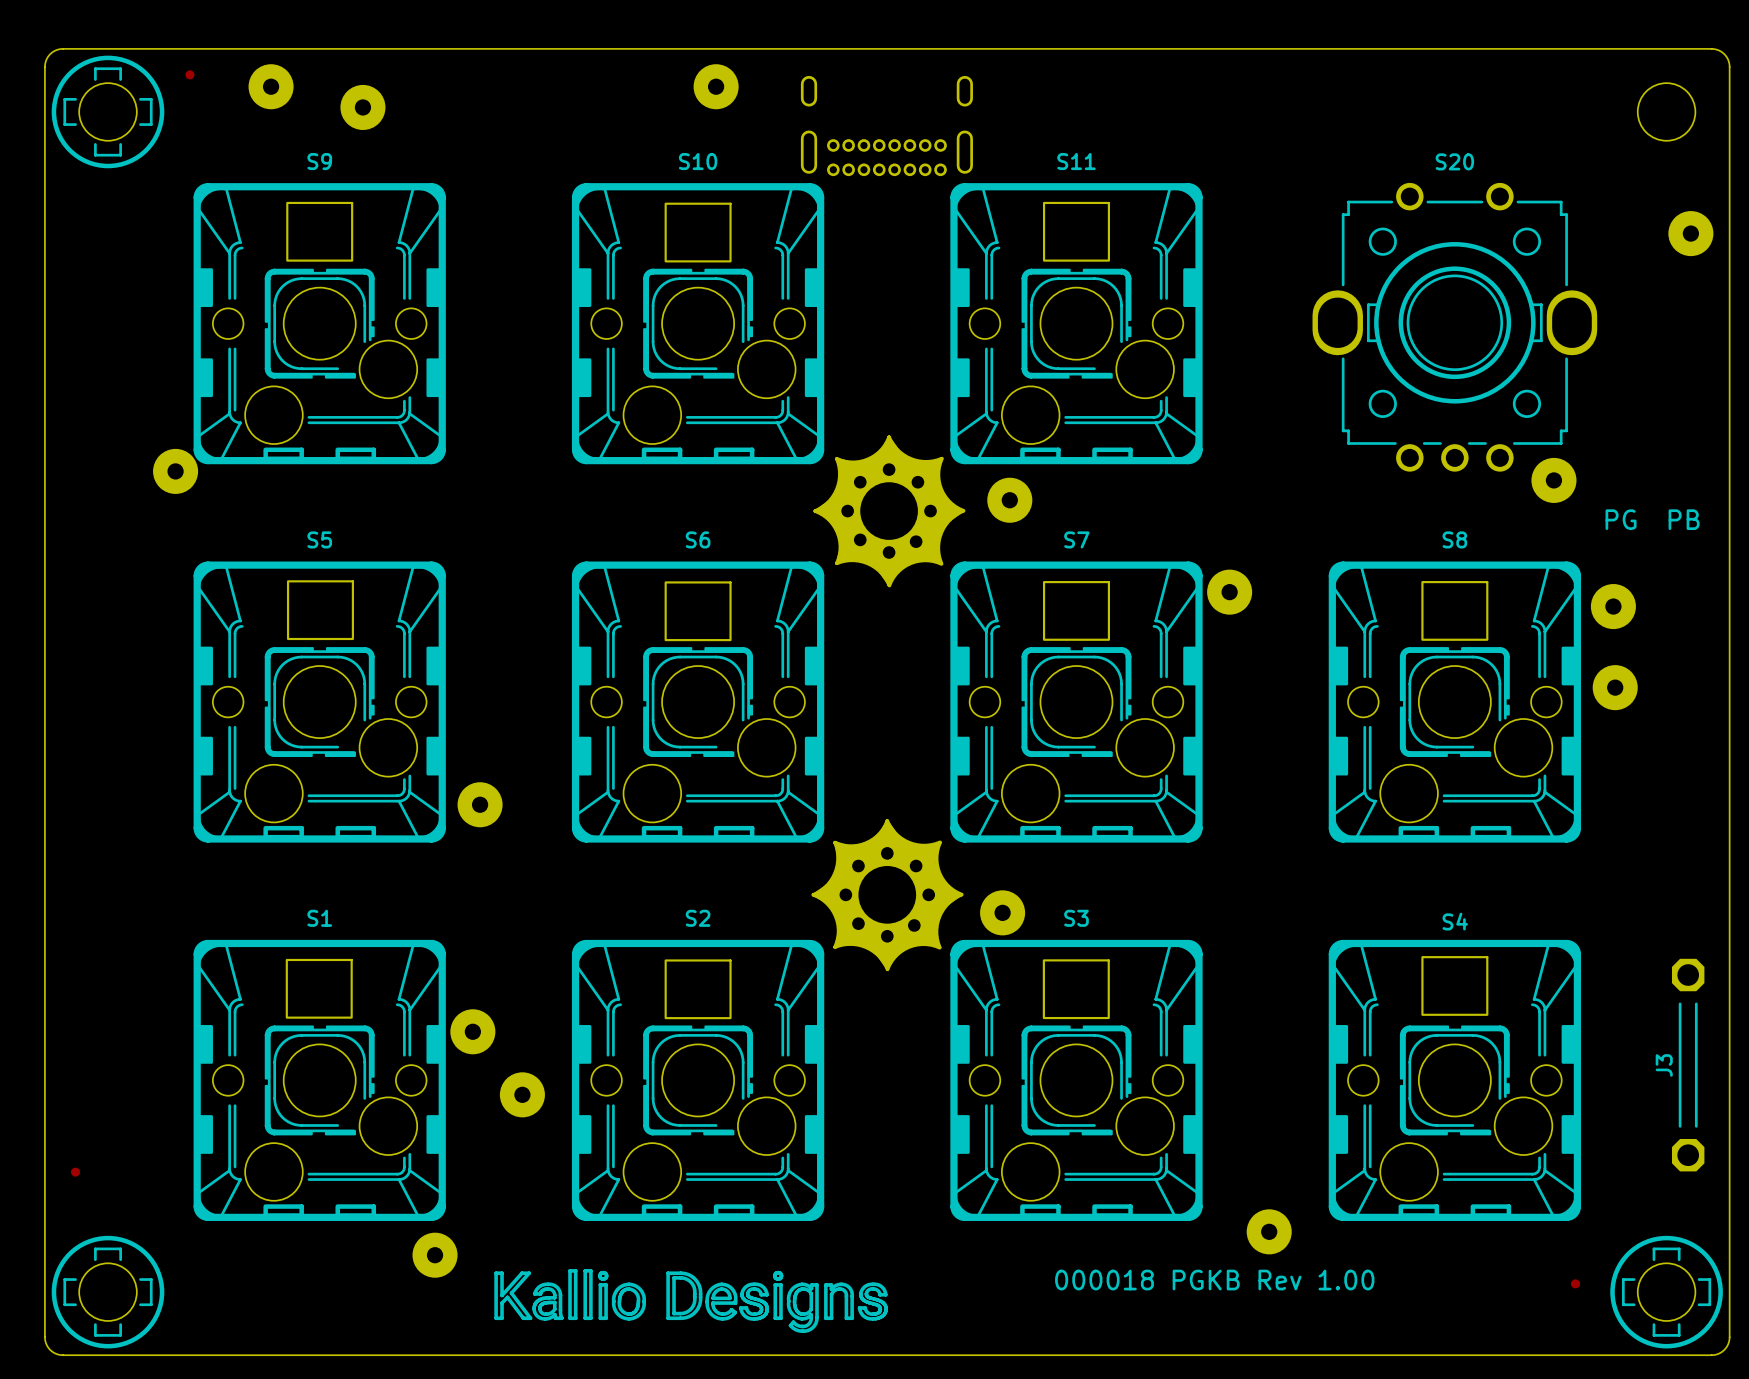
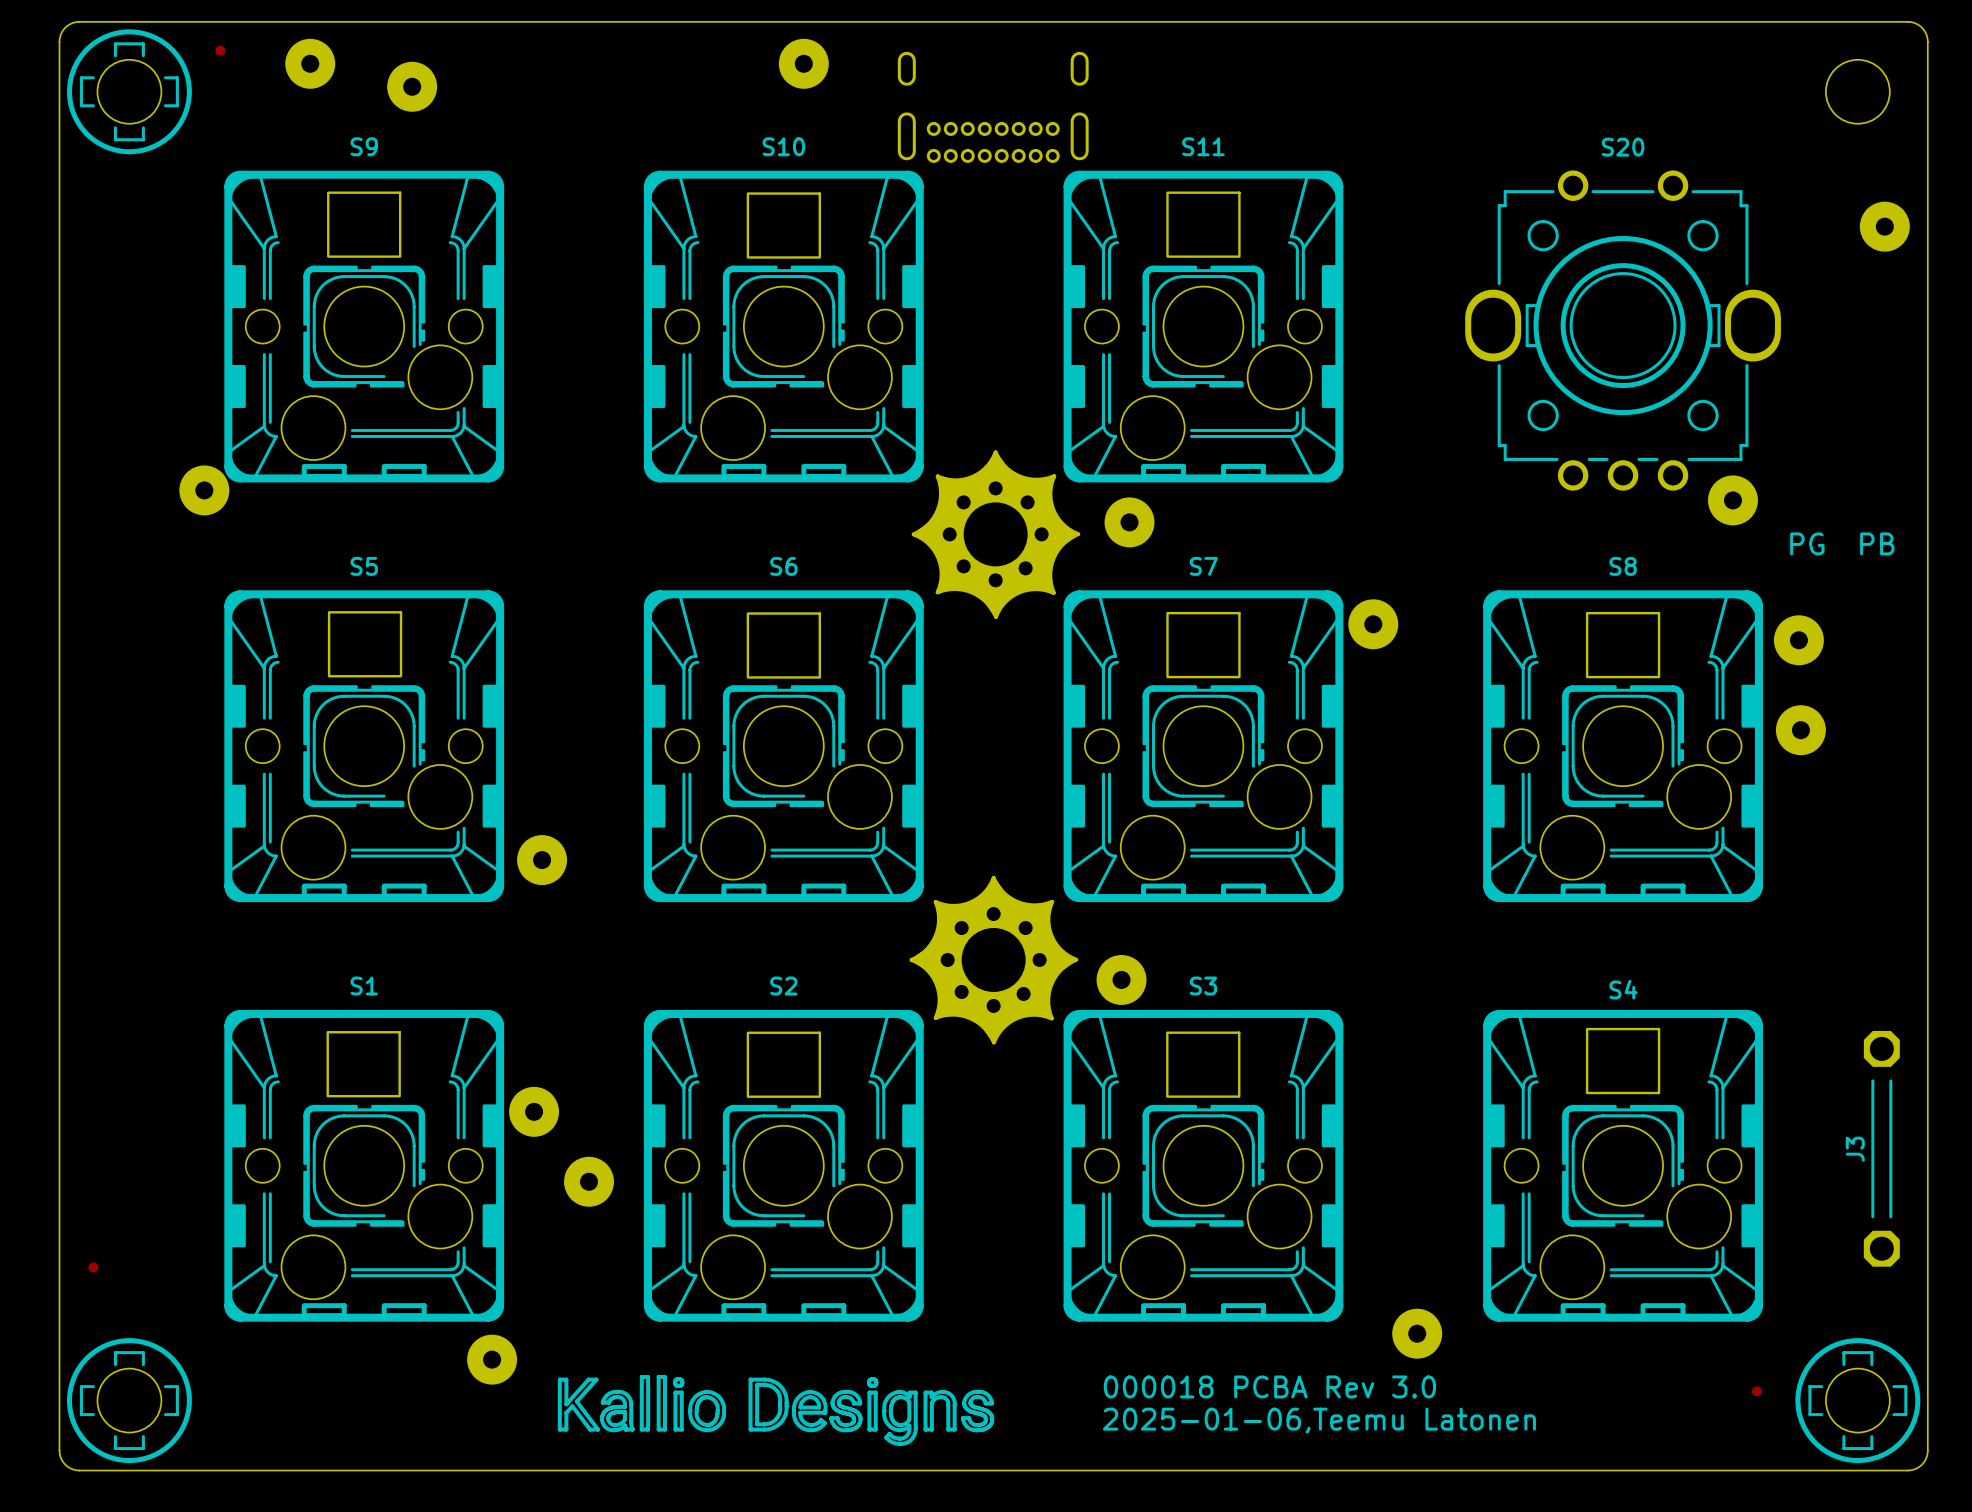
text: 000018 PGKB Rev 1.00 (1214, 1280) -> 000018 PCBA Rev 3.0 (1269, 1386)
text: none -> 2025-01-06,Teemu Latonen (1319, 1420)

